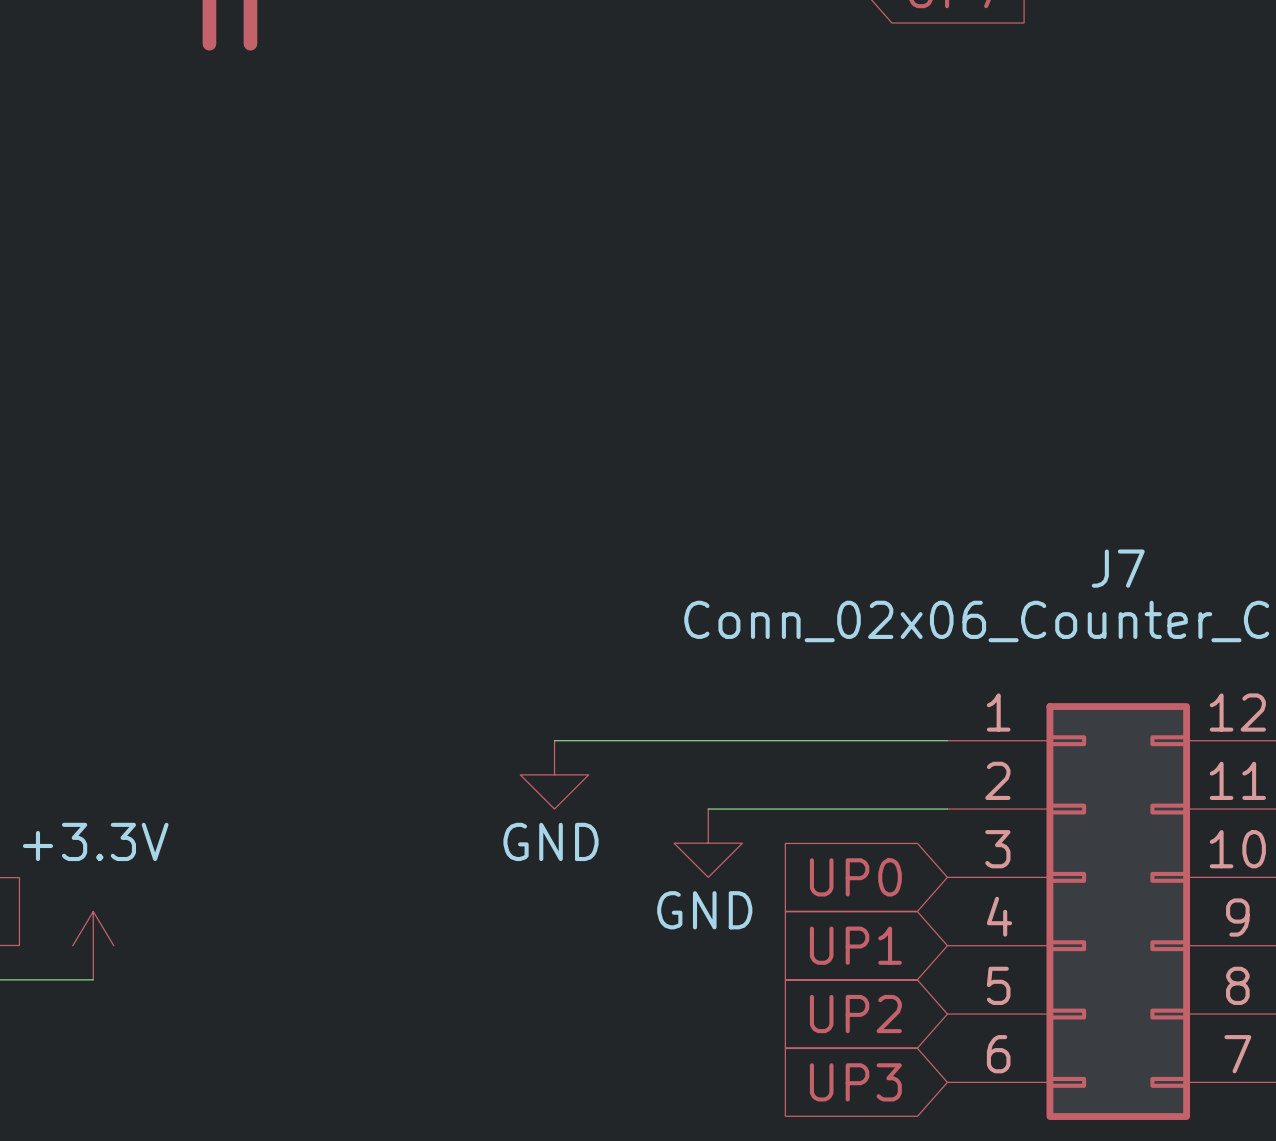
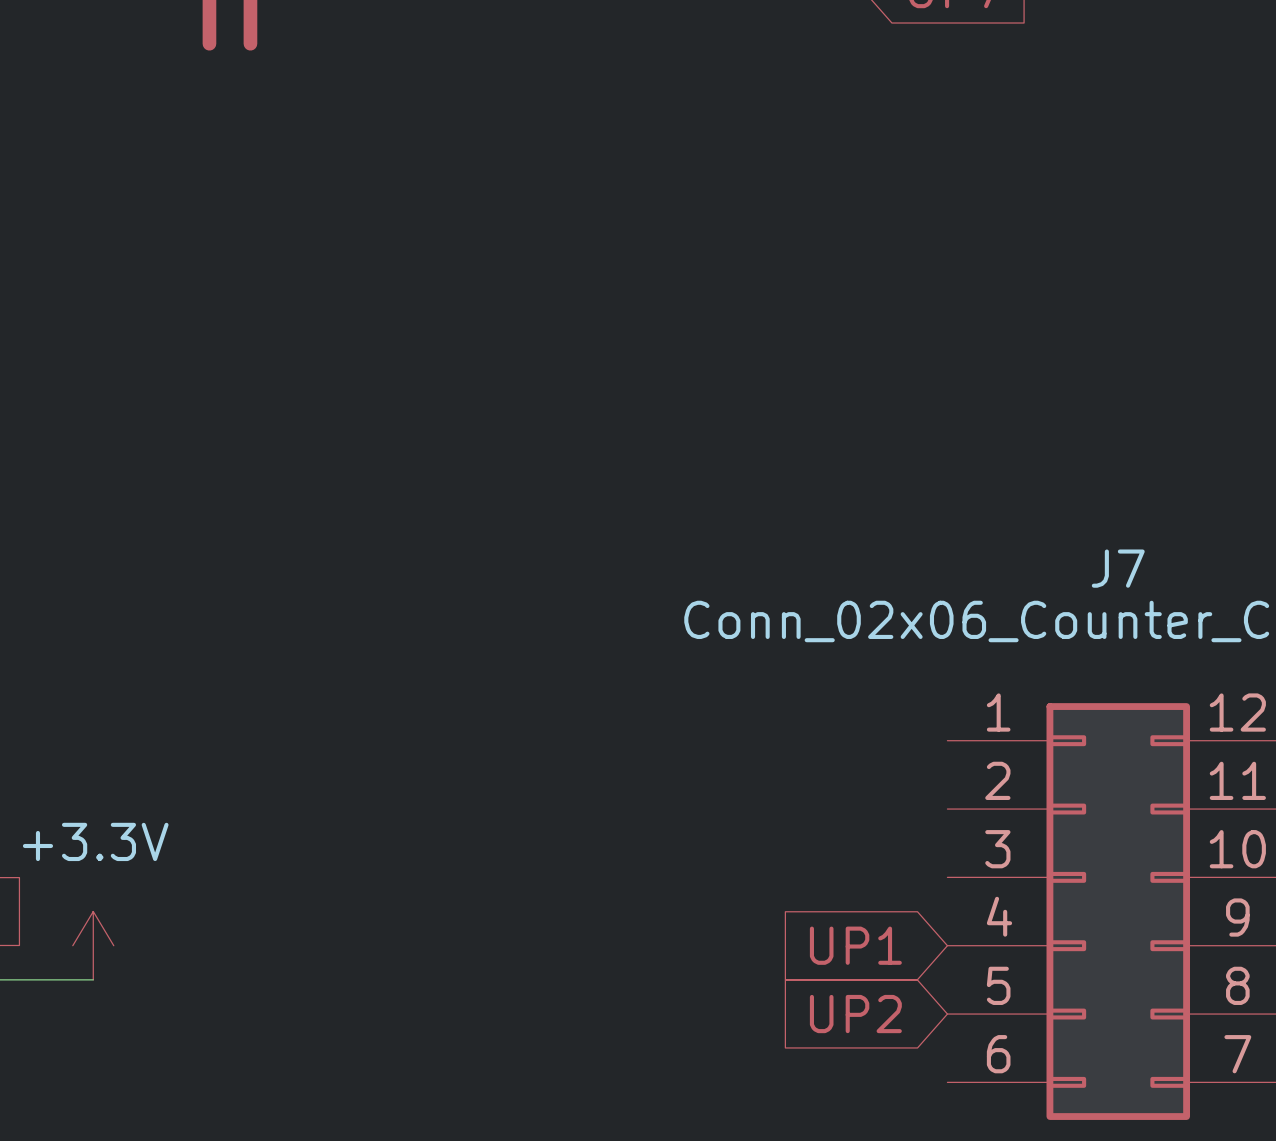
wire: (554, 740) (947, 740) -> none
power symbol: GND (554, 774) -> none
wire: (708, 809) (947, 809) -> none
power symbol: GND (708, 843) -> none
global label: UP0 (855, 877) -> none
global label: UP3 (855, 1082) -> none

